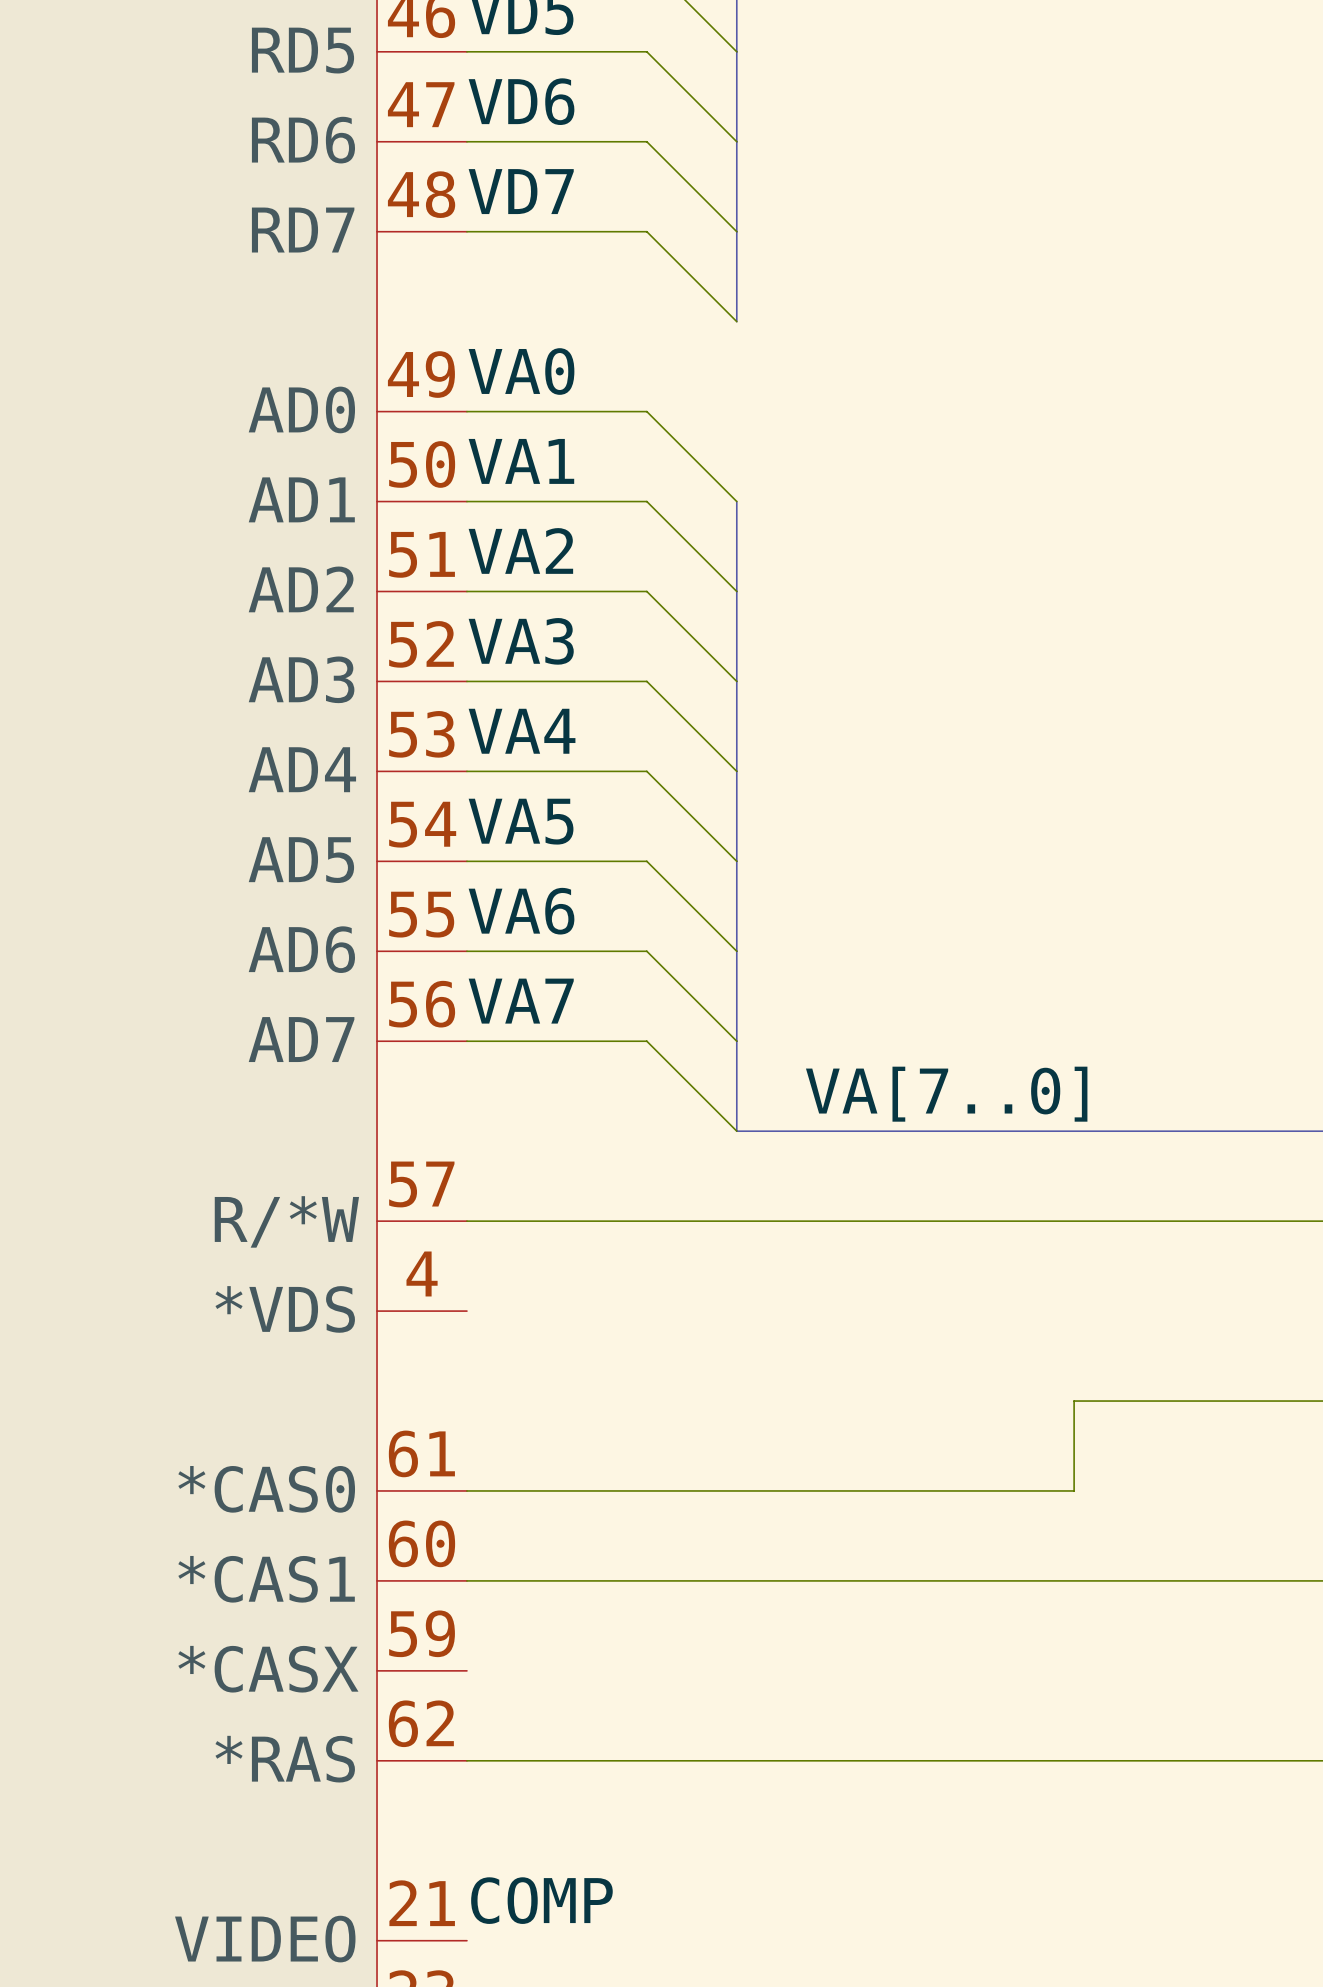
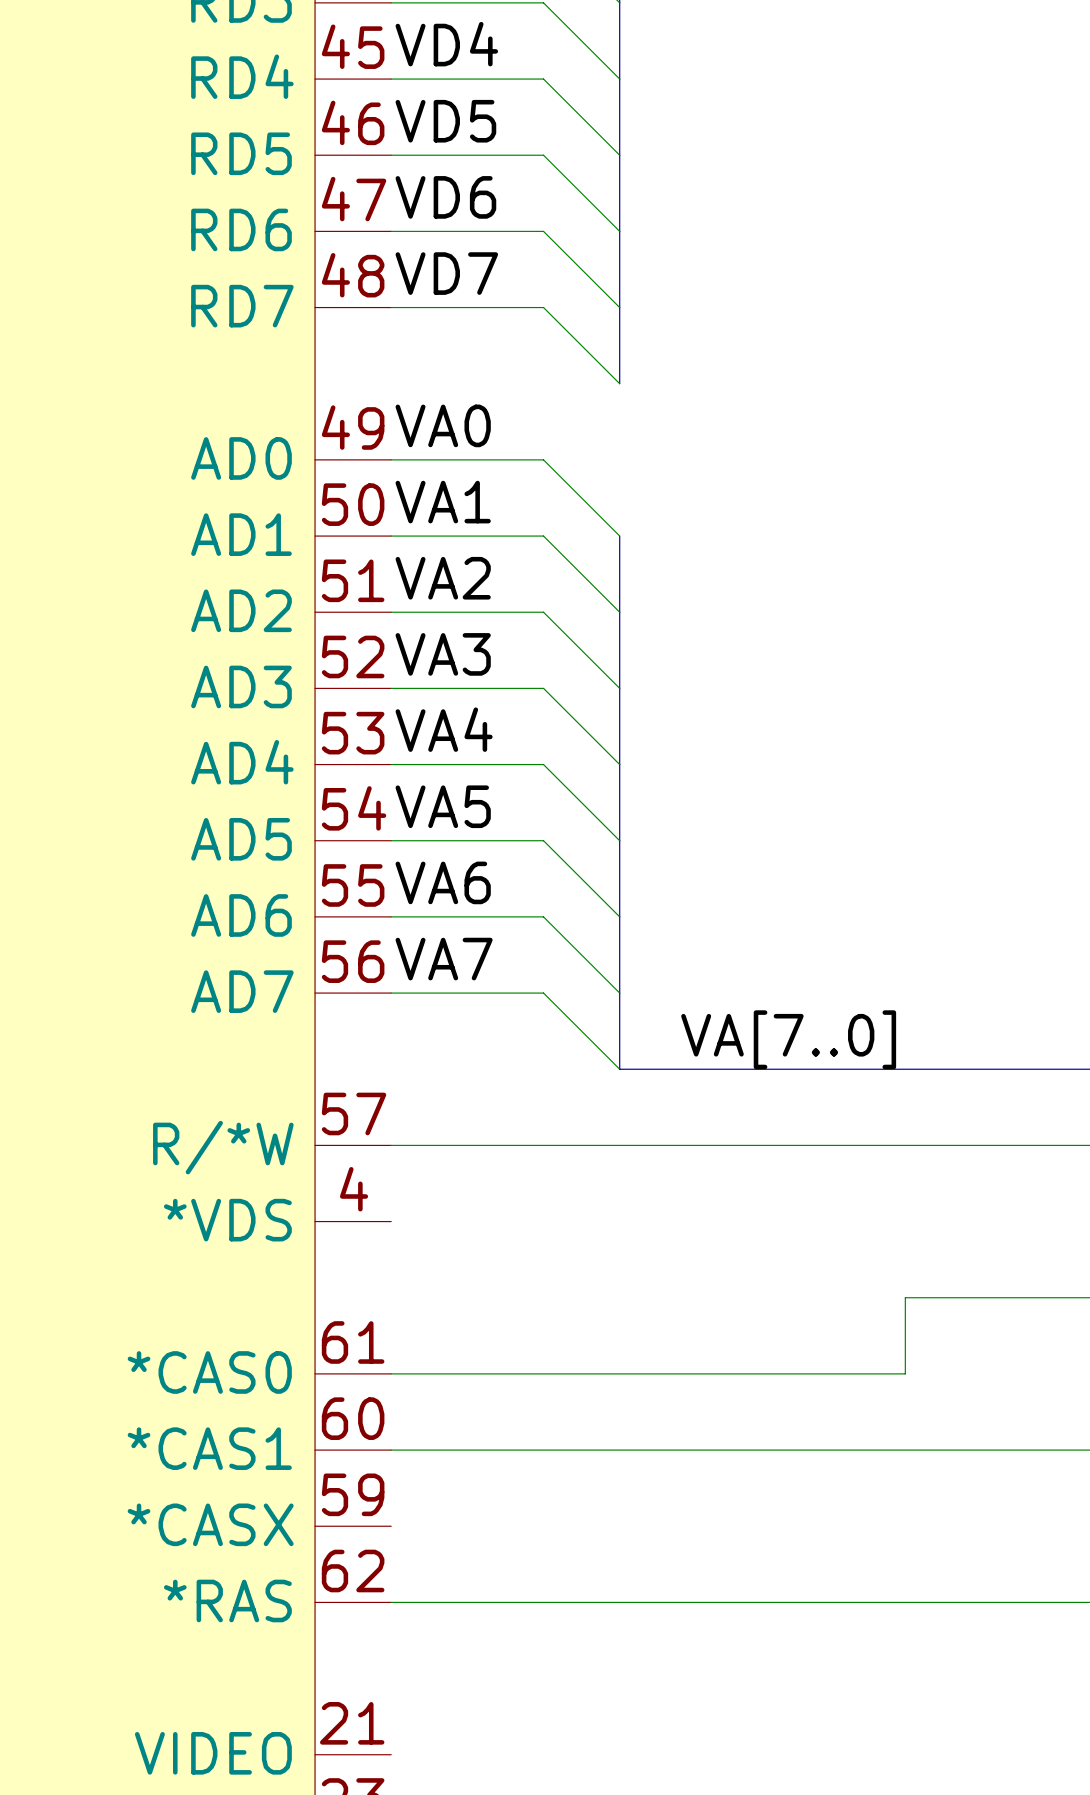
label: COMP (541, 1900) -> none

